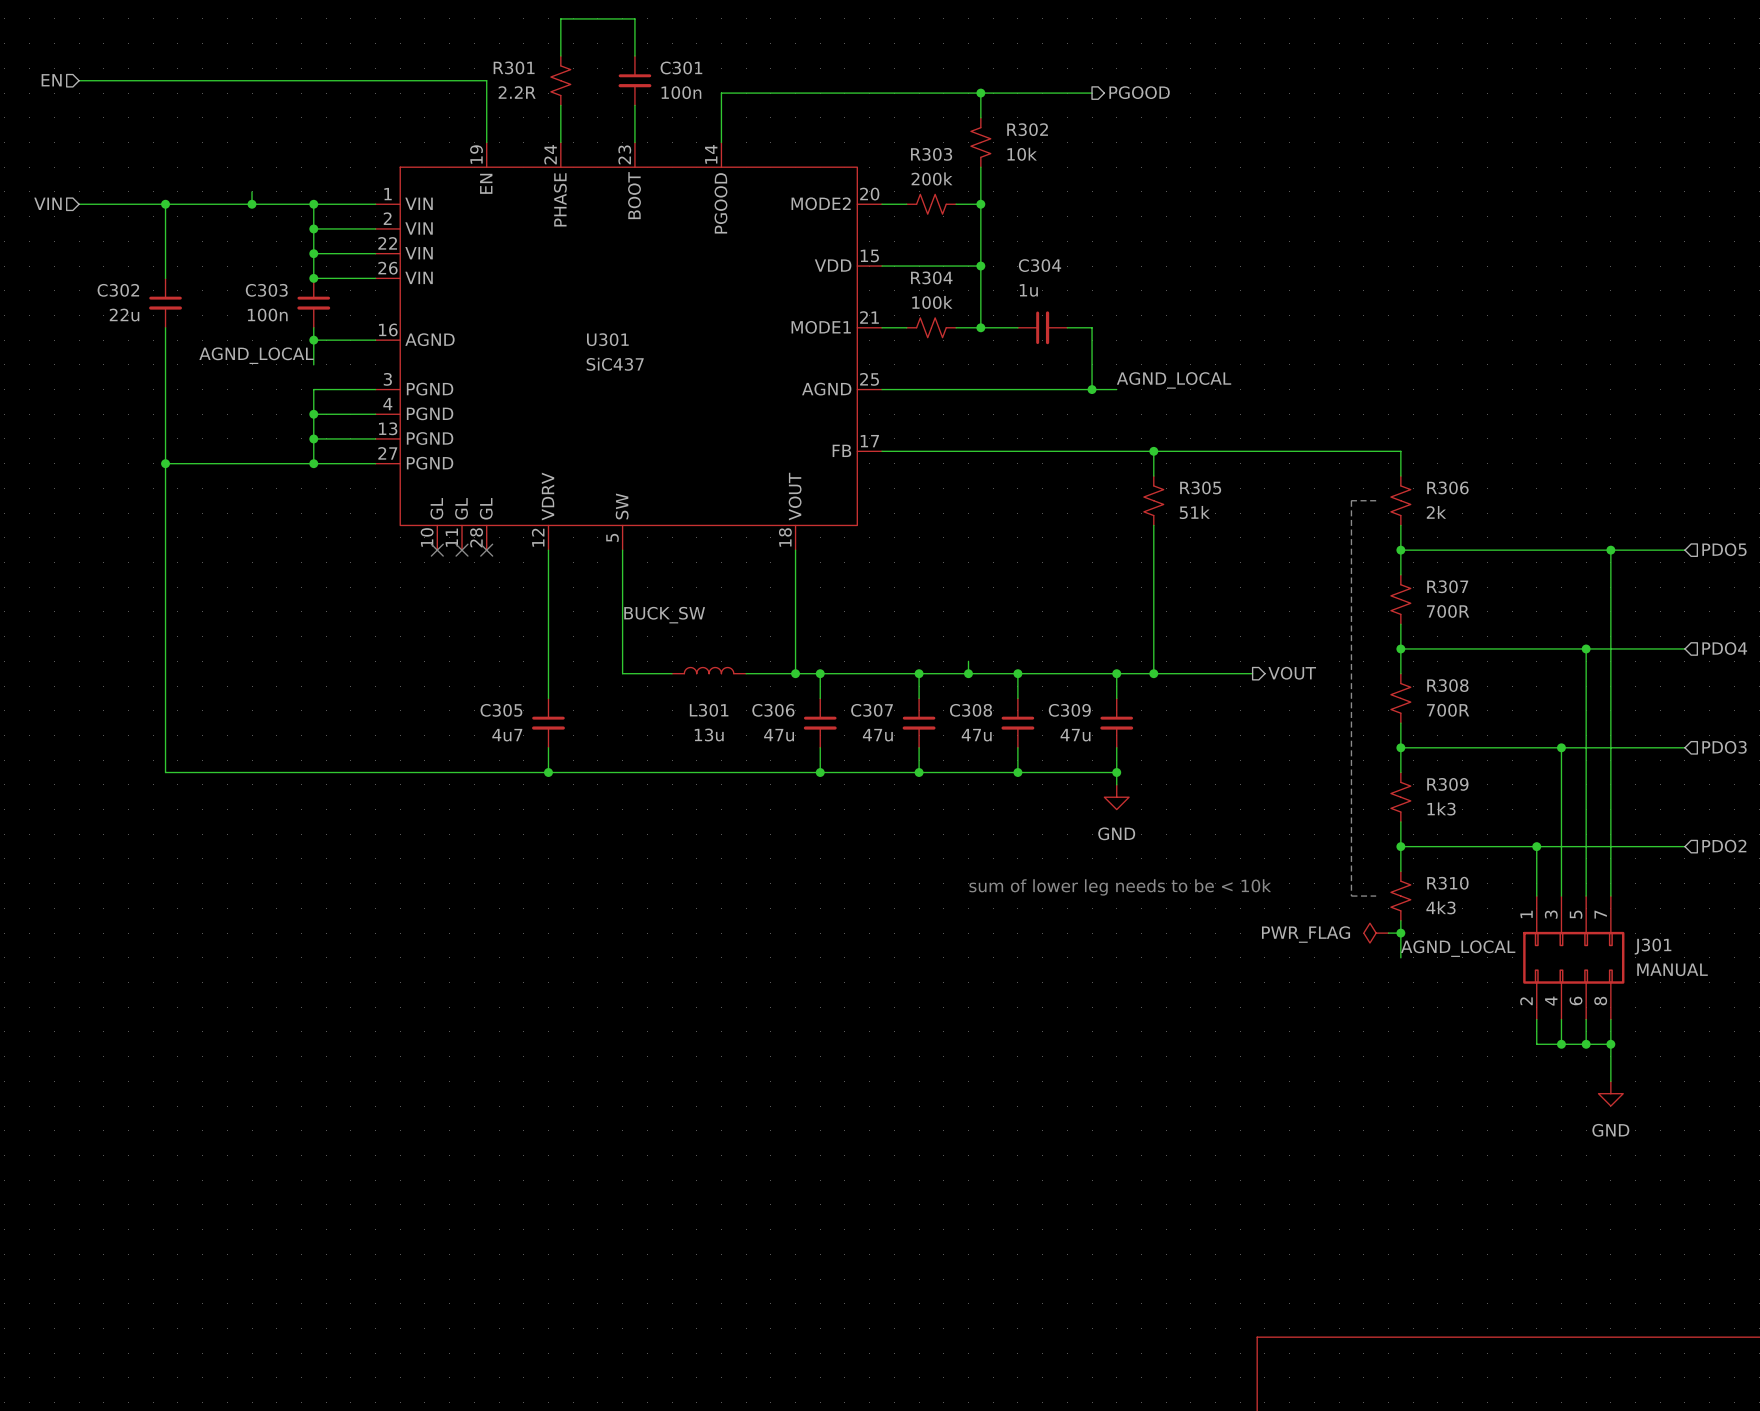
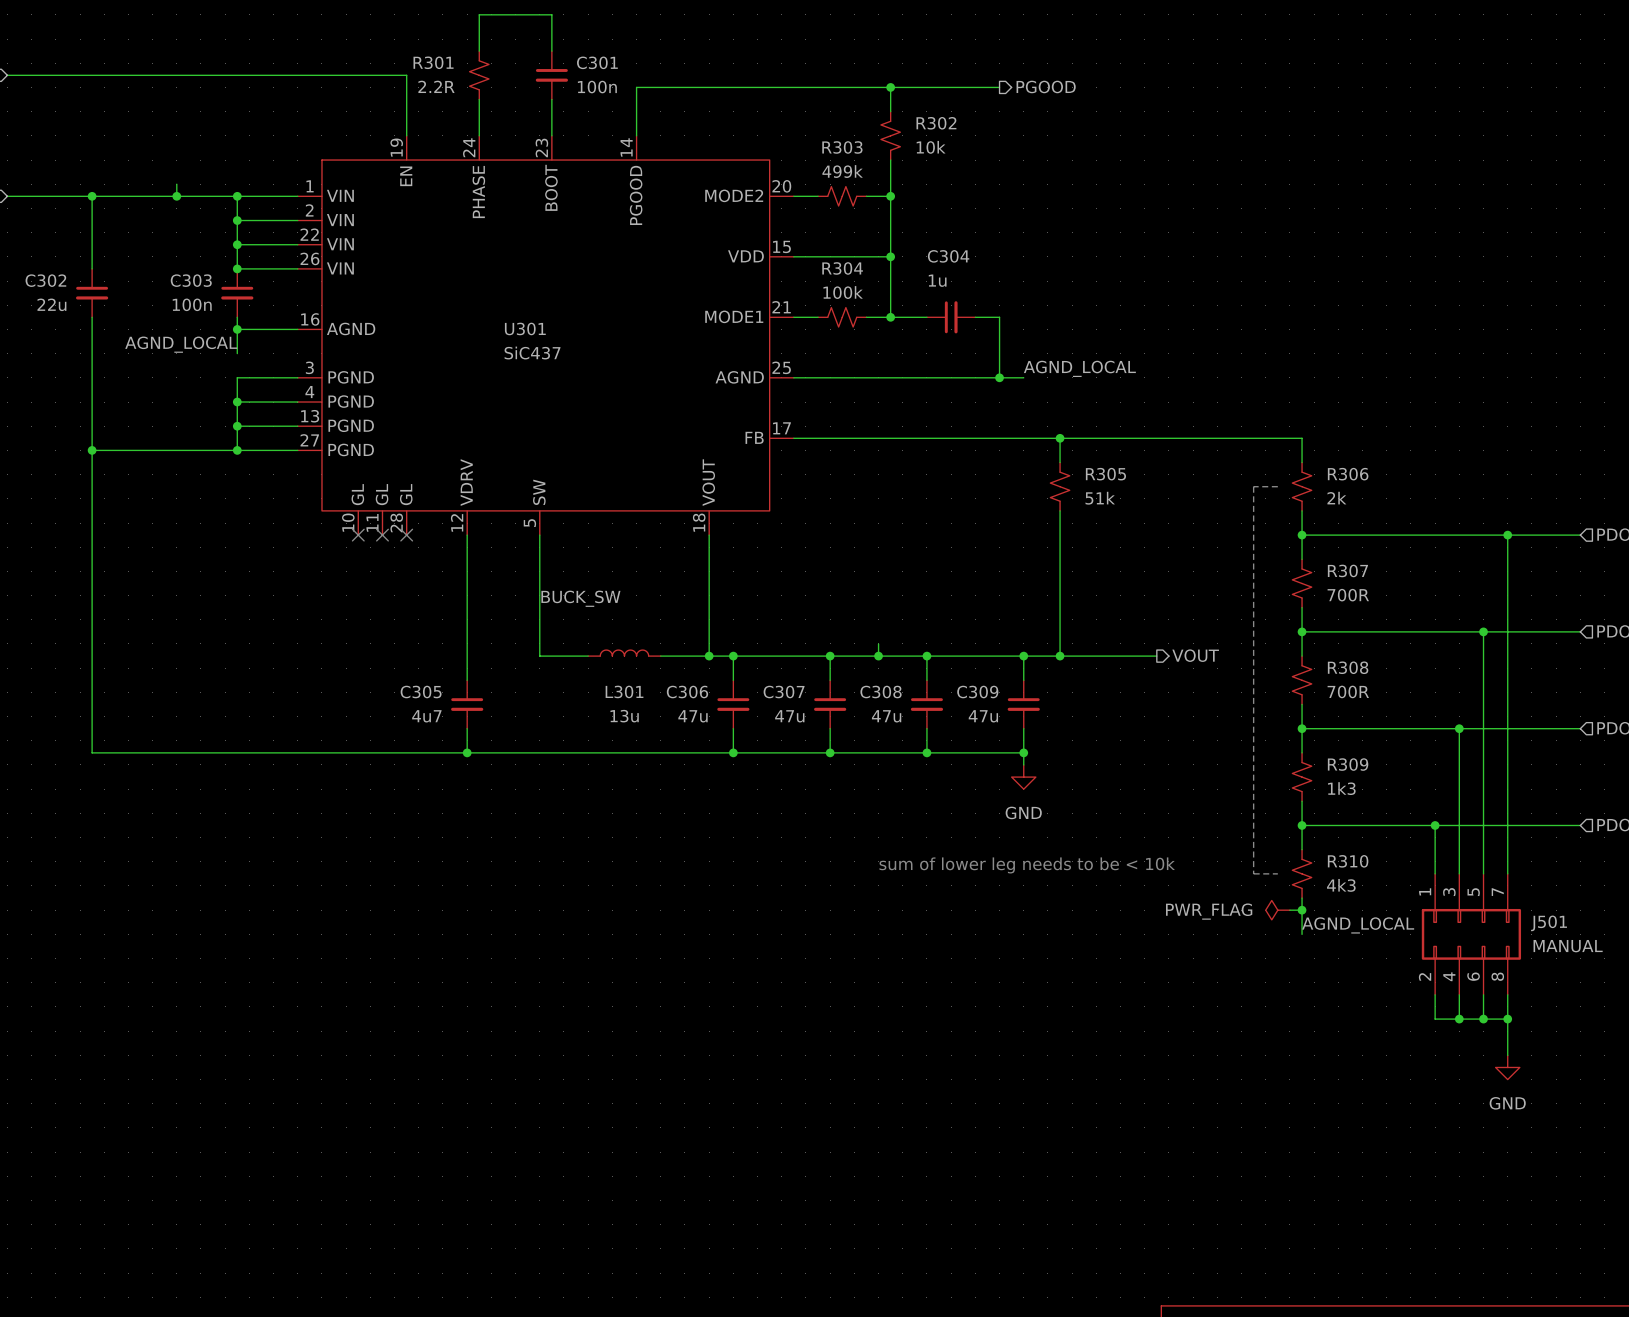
R303 value: 200k (932, 178) -> 499k (842, 171)
J301 name: J301 (1653, 946) -> J501 (1549, 923)

